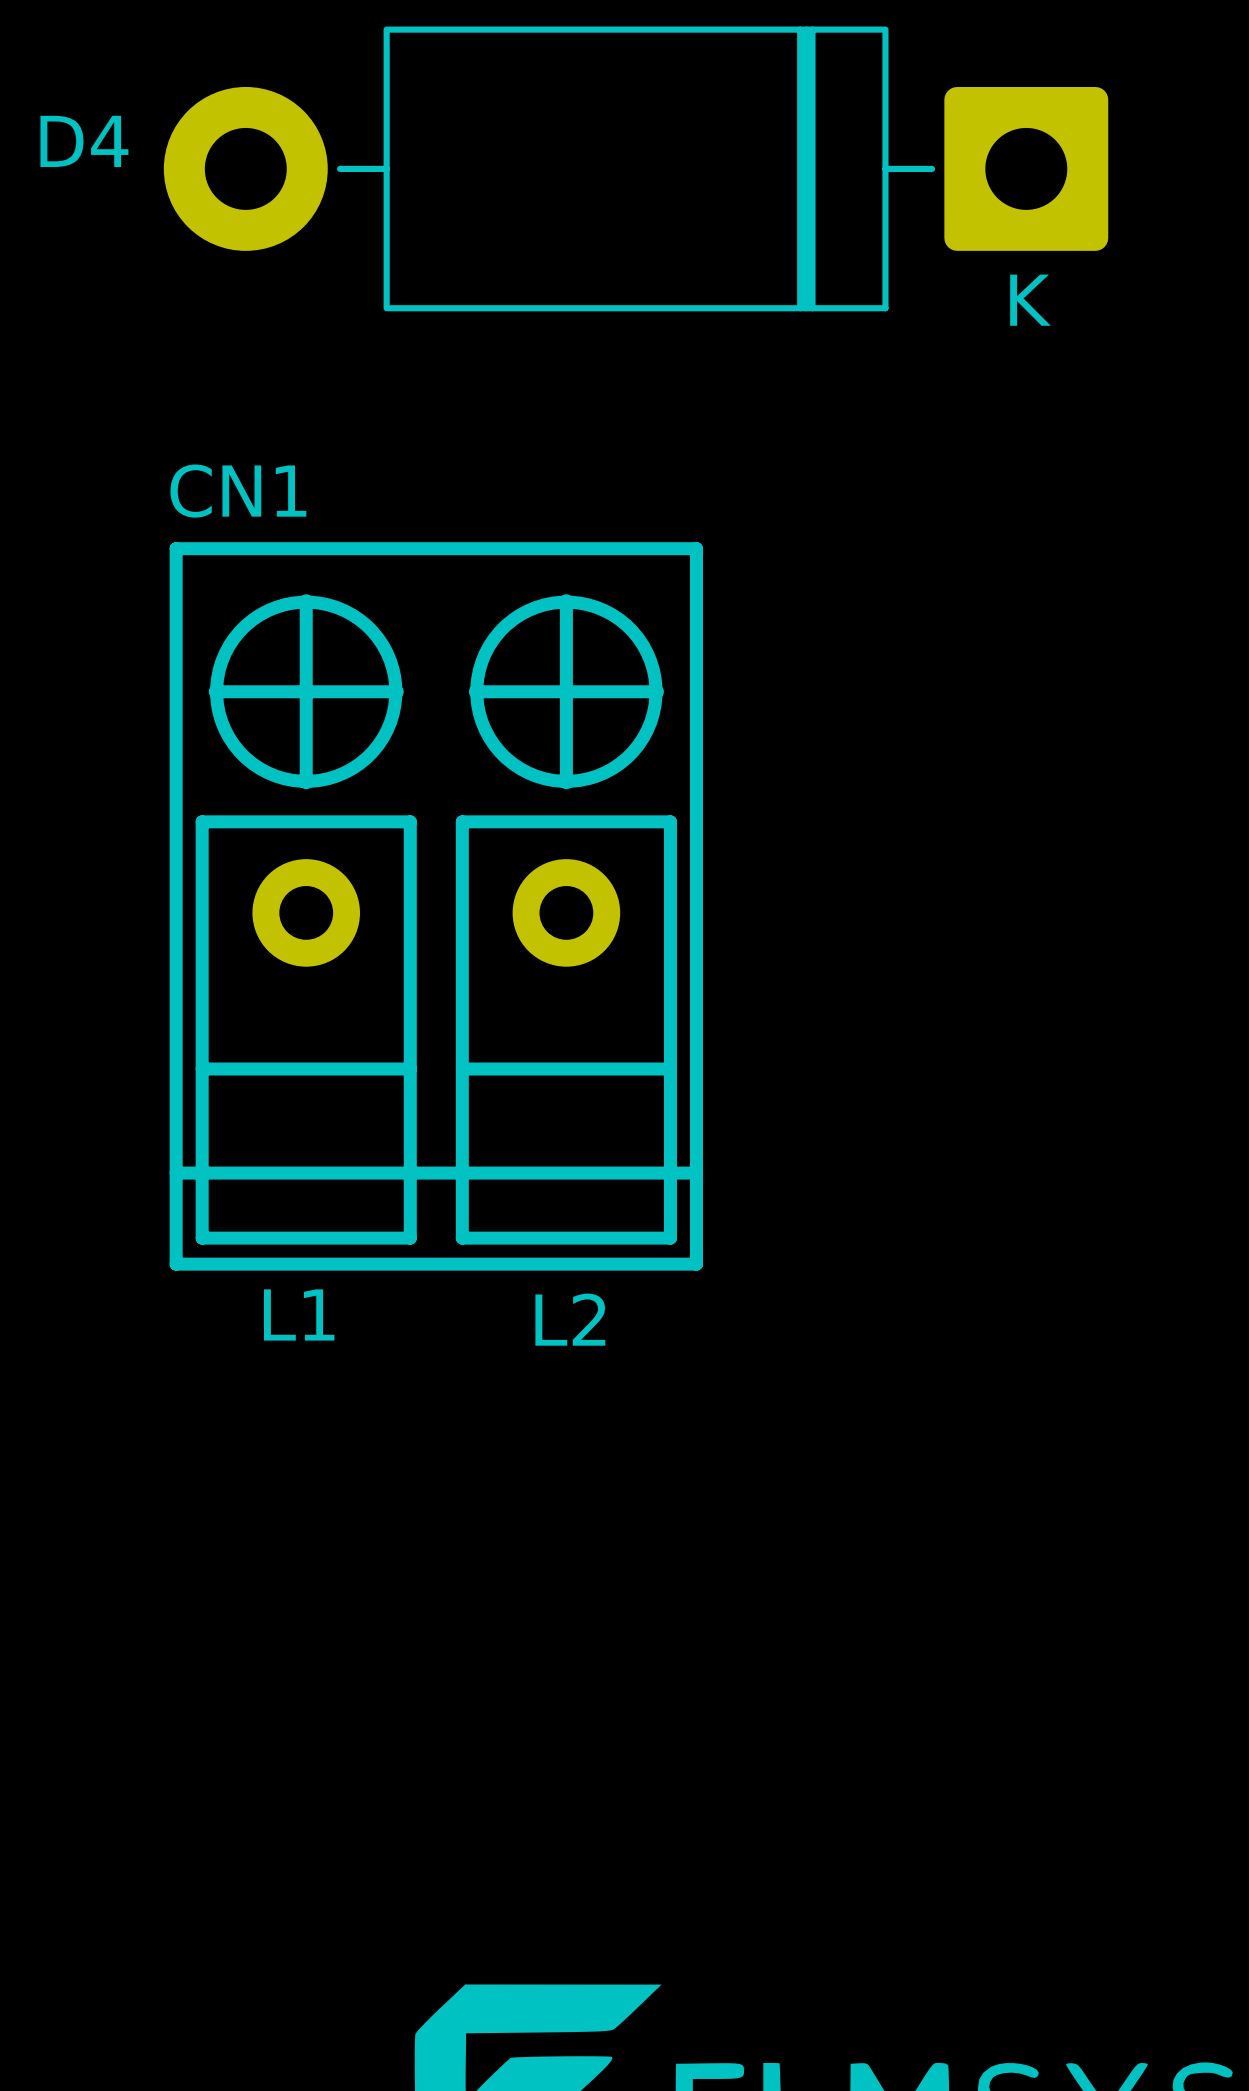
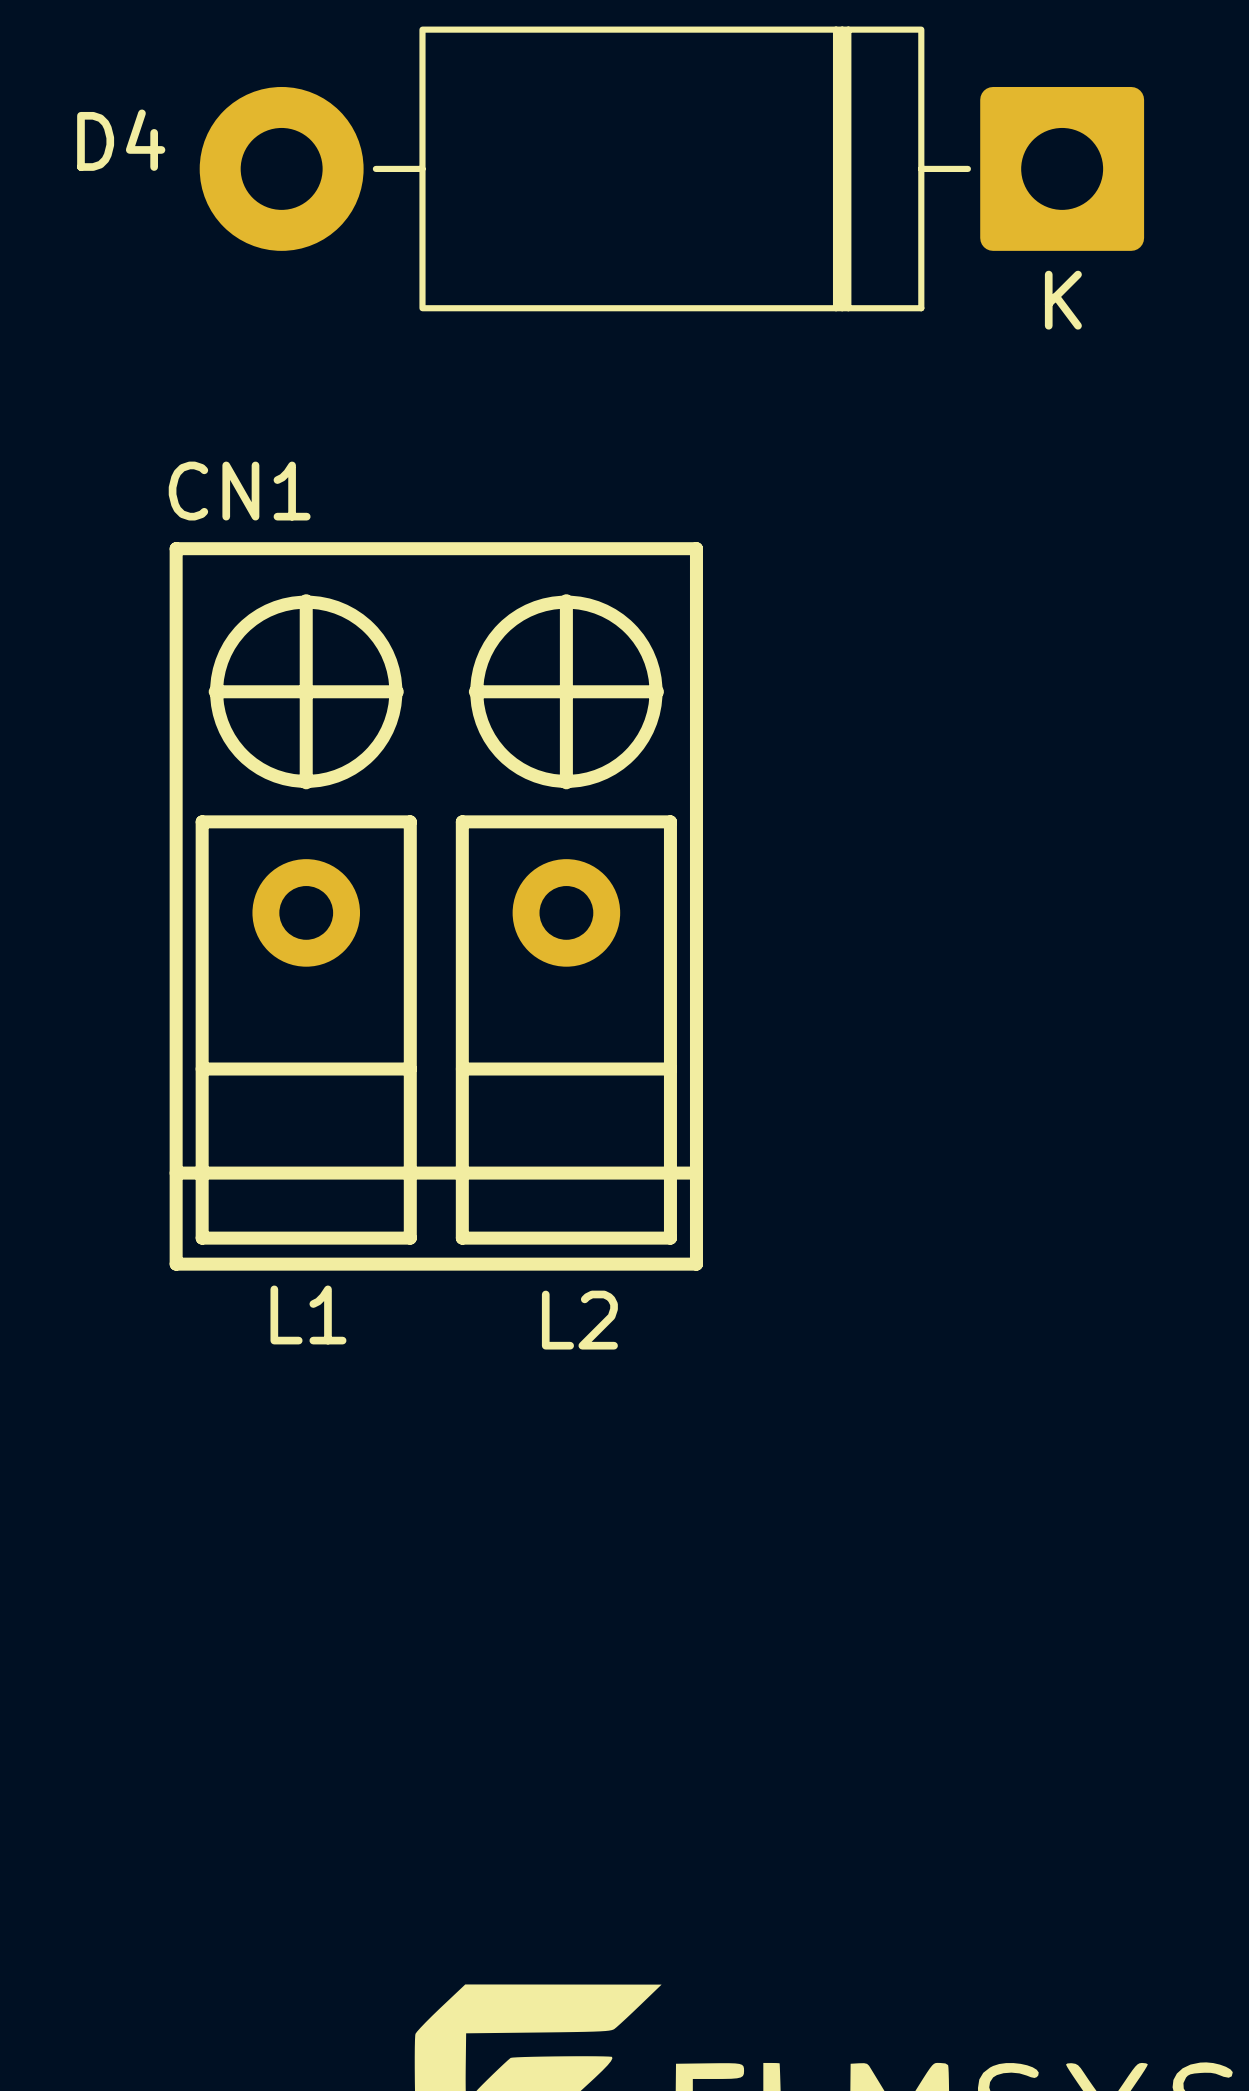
D4 position: (636, 168) -> (671, 168)

